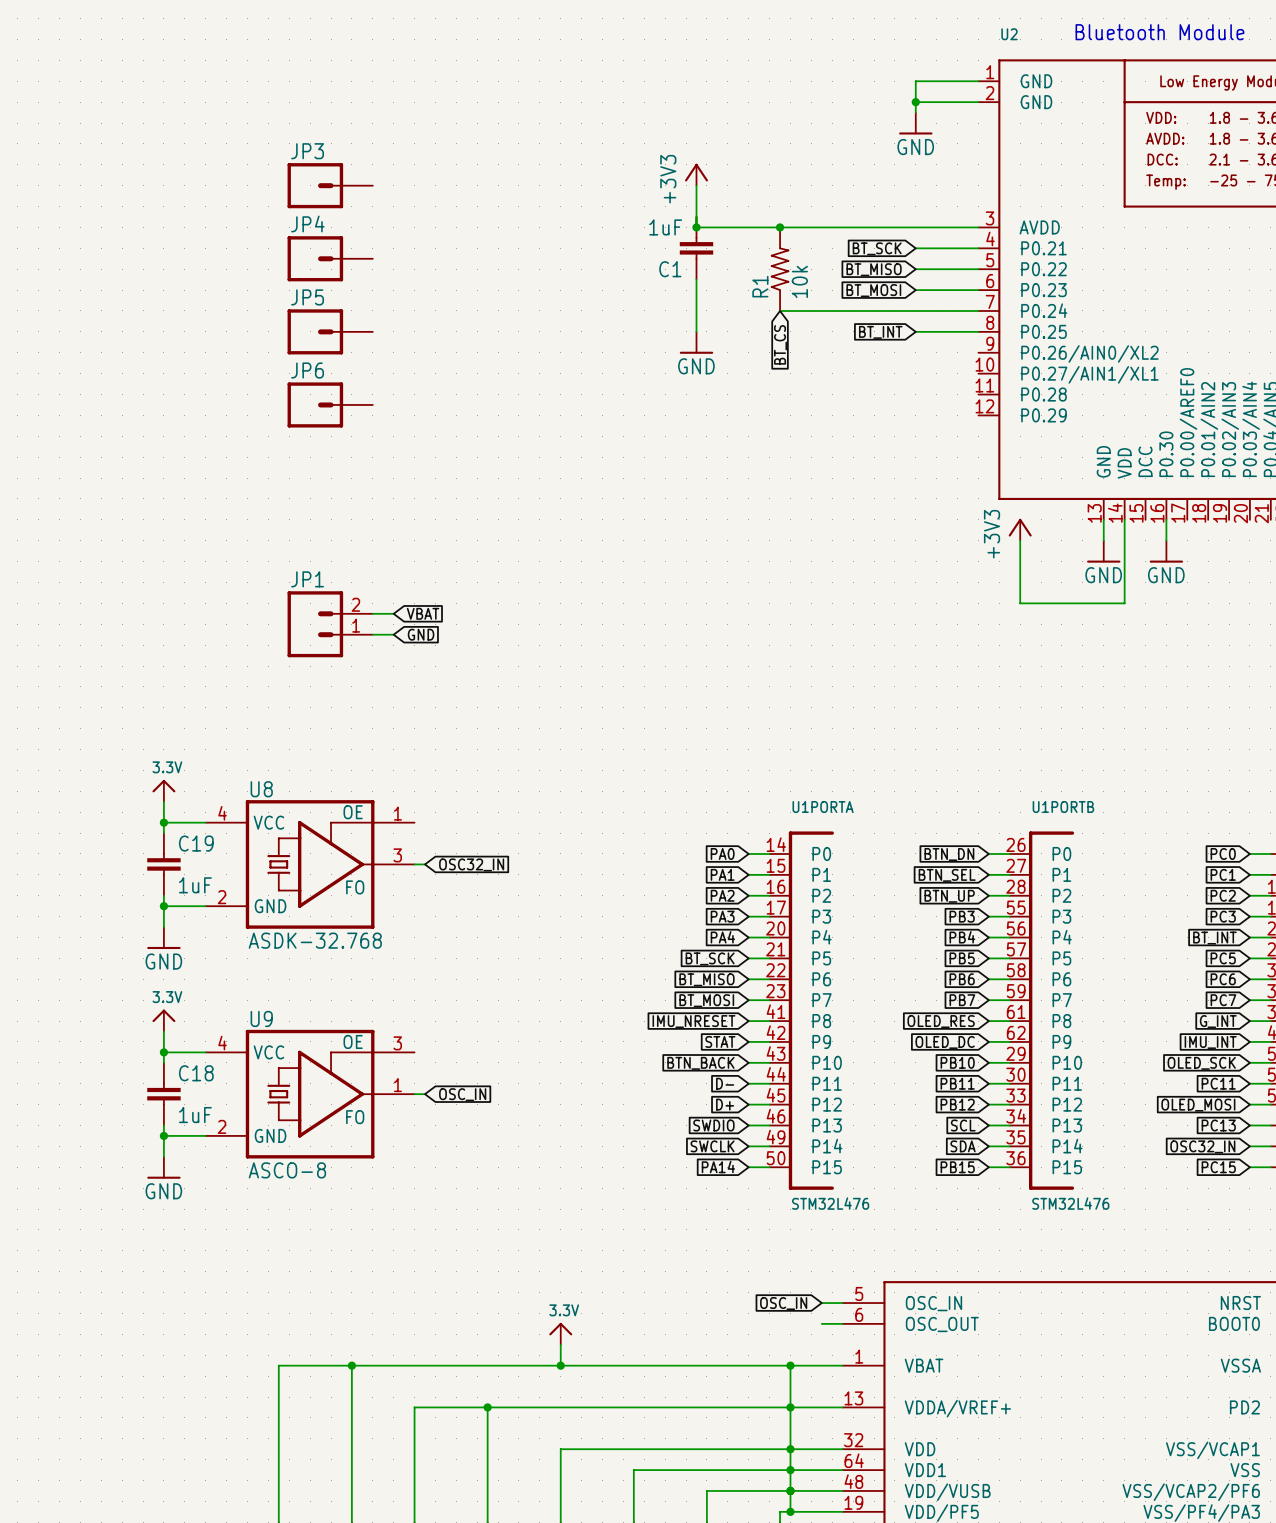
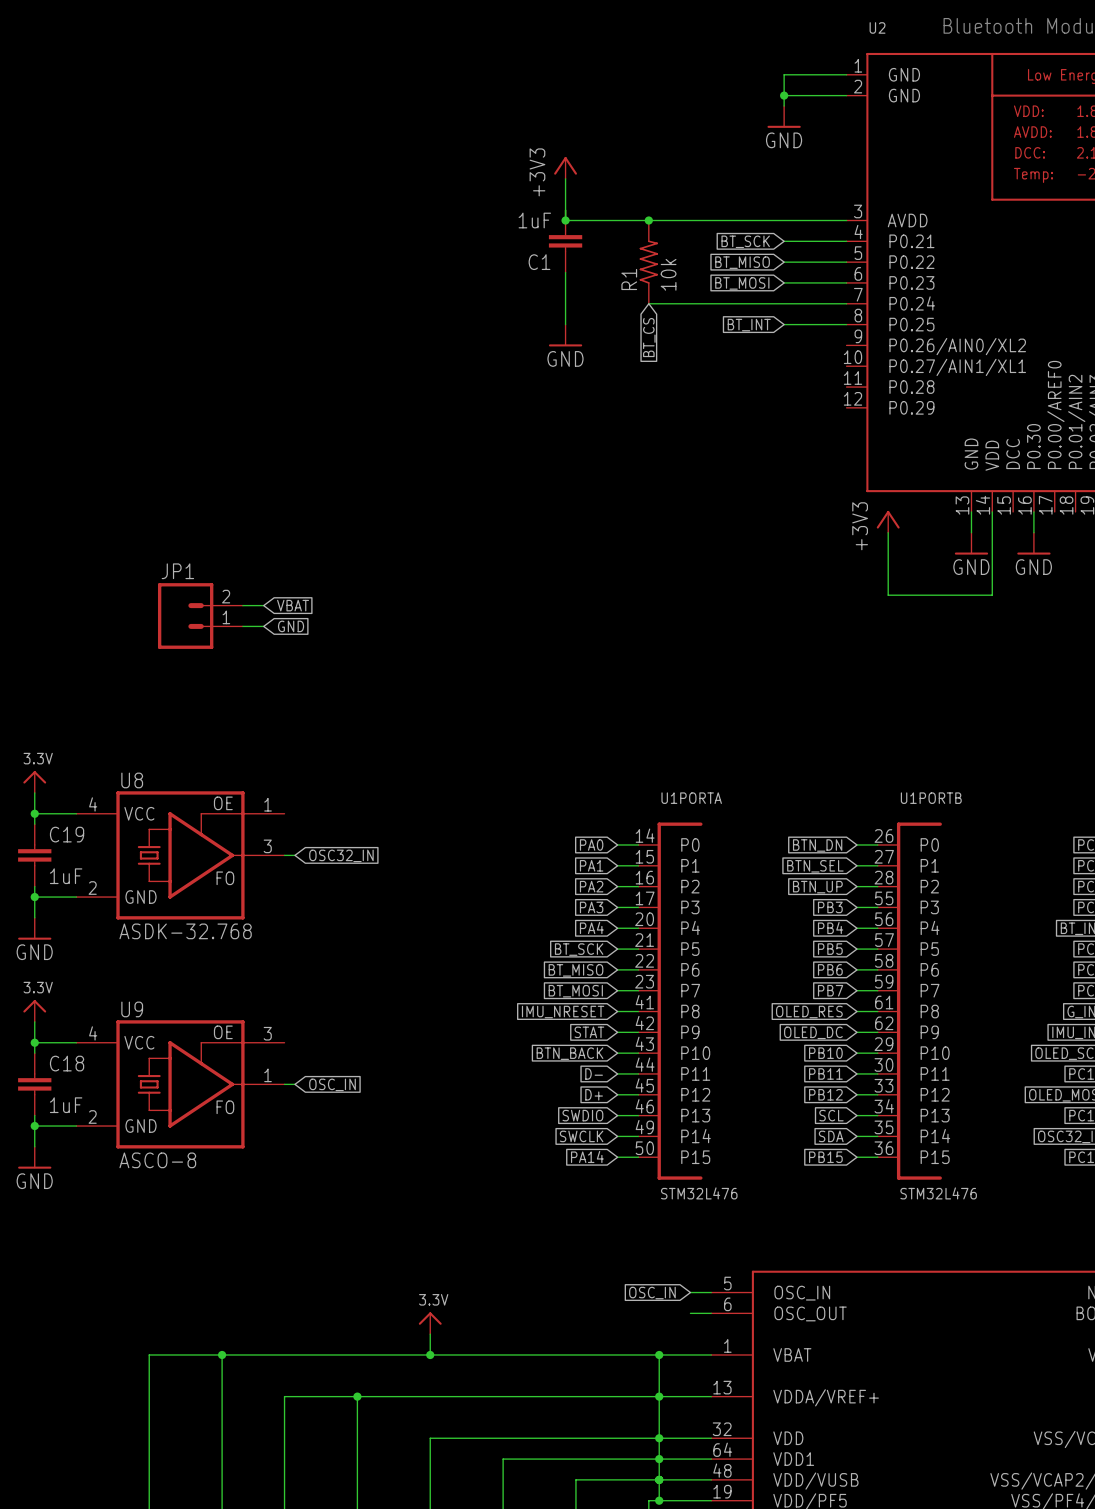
JP3: (330, 185) -> none
JP4: (330, 258) -> none
JP5: (330, 331) -> none
JP6: (330, 404) -> none

